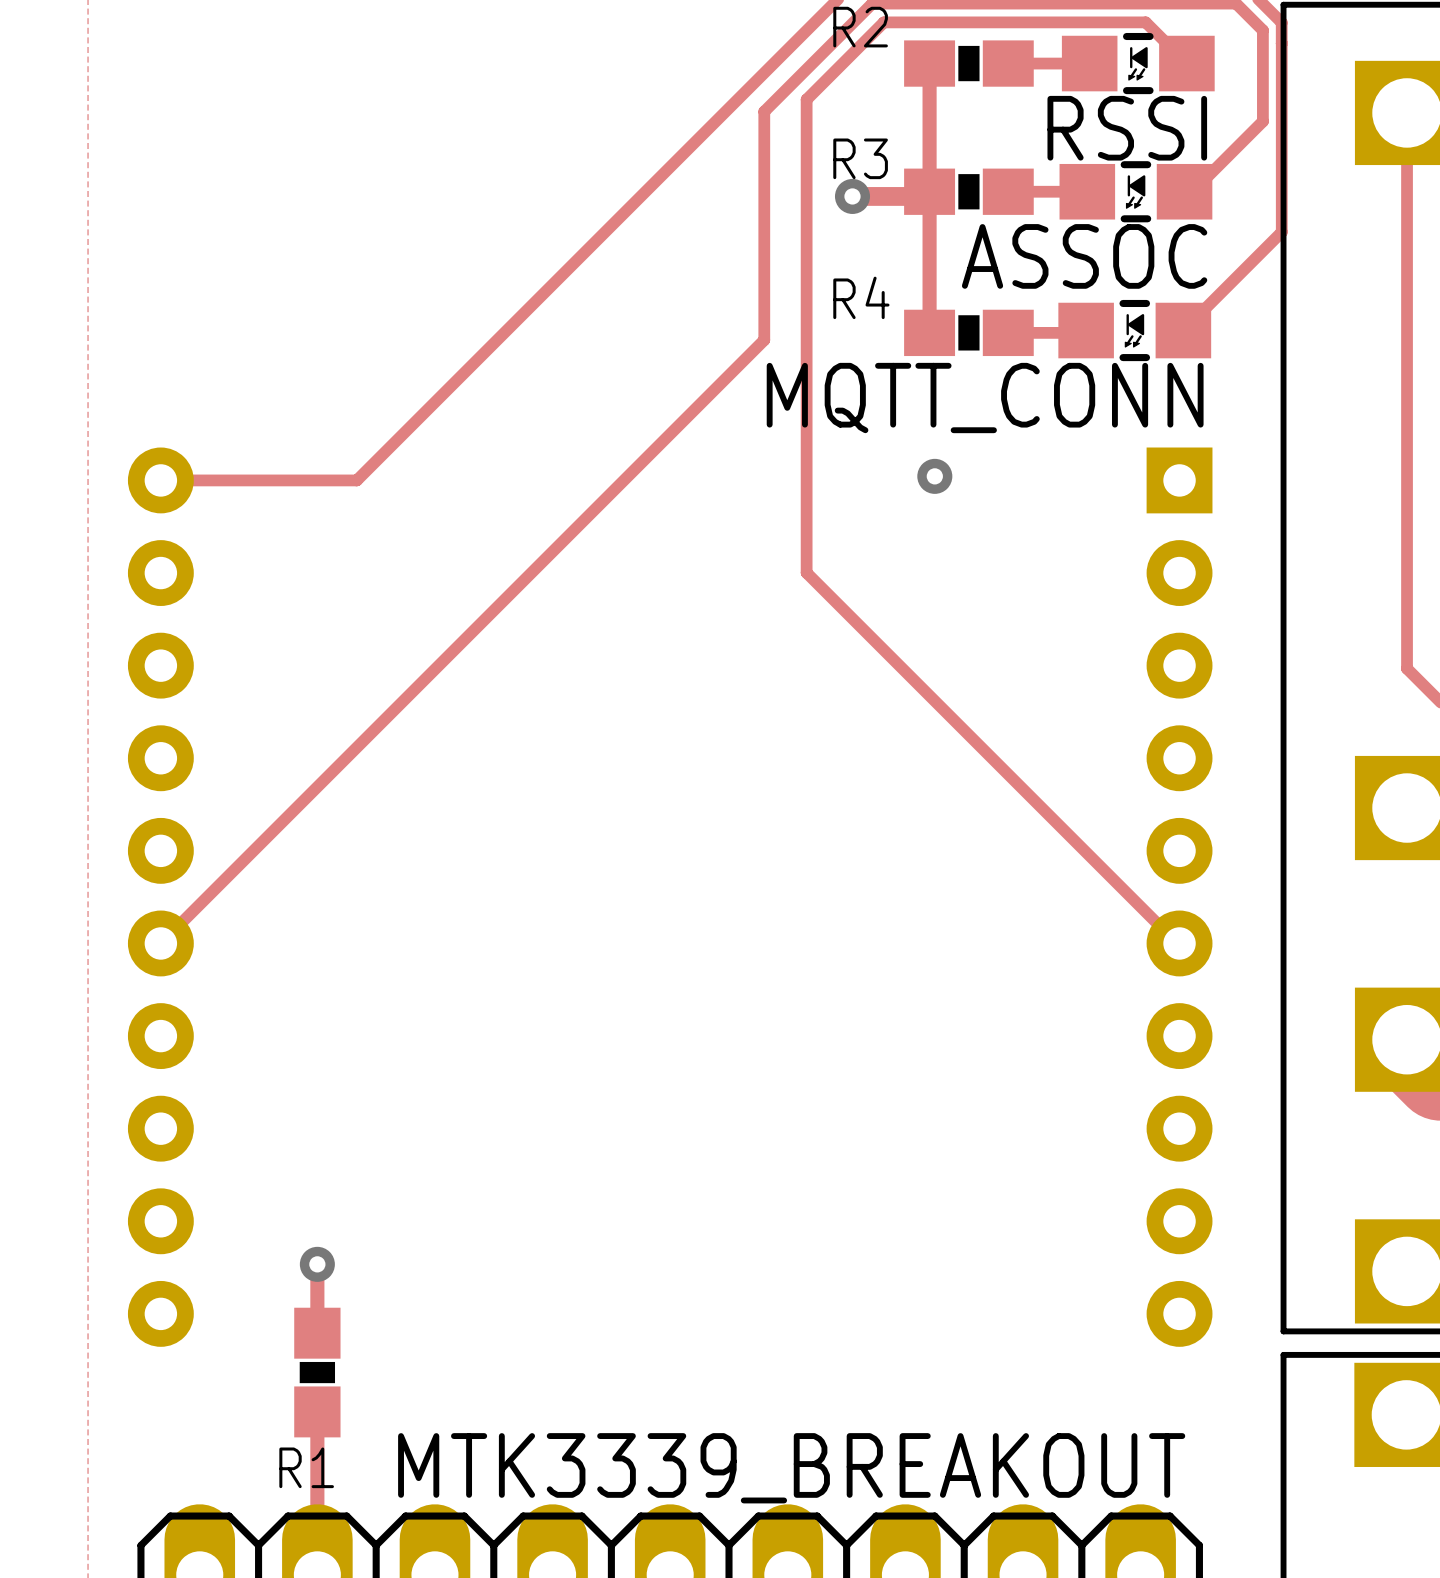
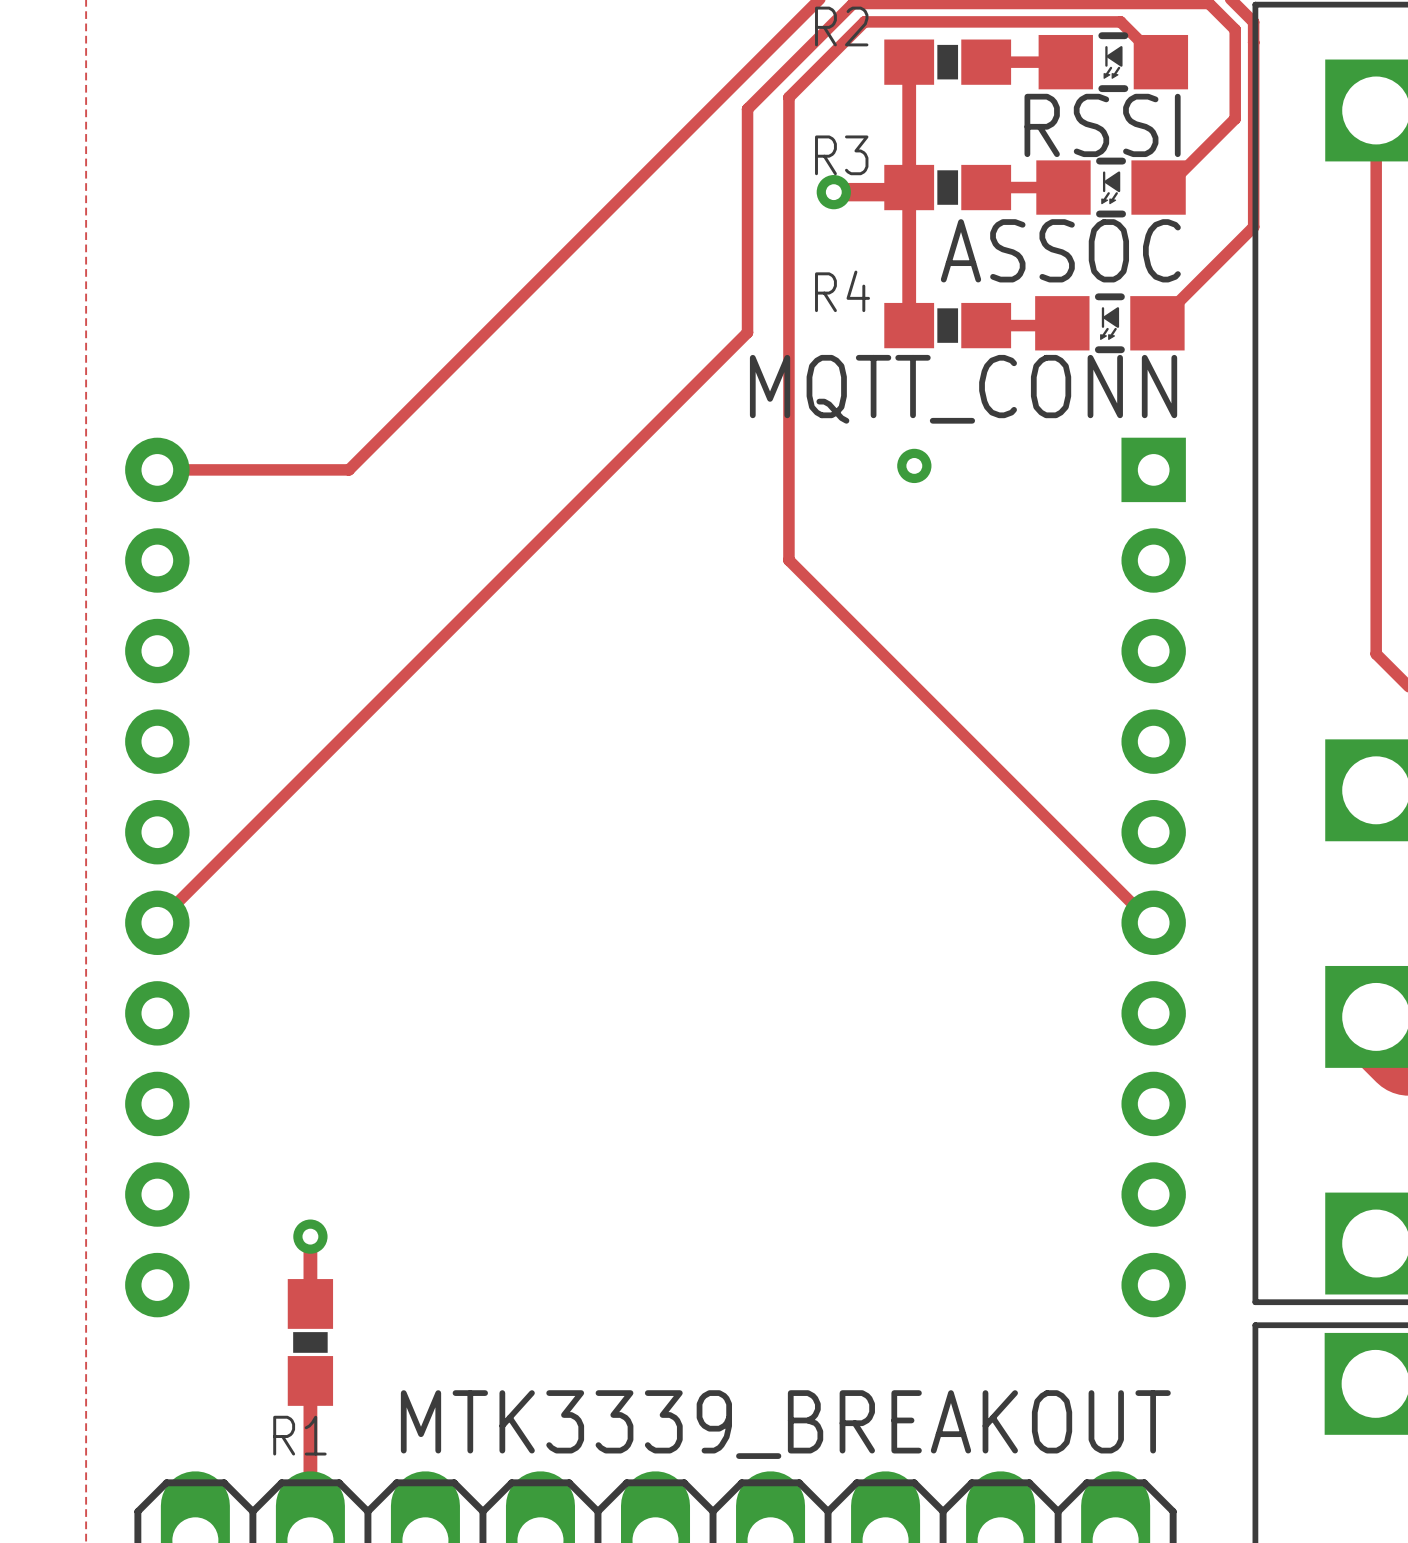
MTK3339_BREAKOUT name position: MTK3339_BREAKOUT (791, 1468) -> MTK3339_BREAKOUT (785, 1424)

